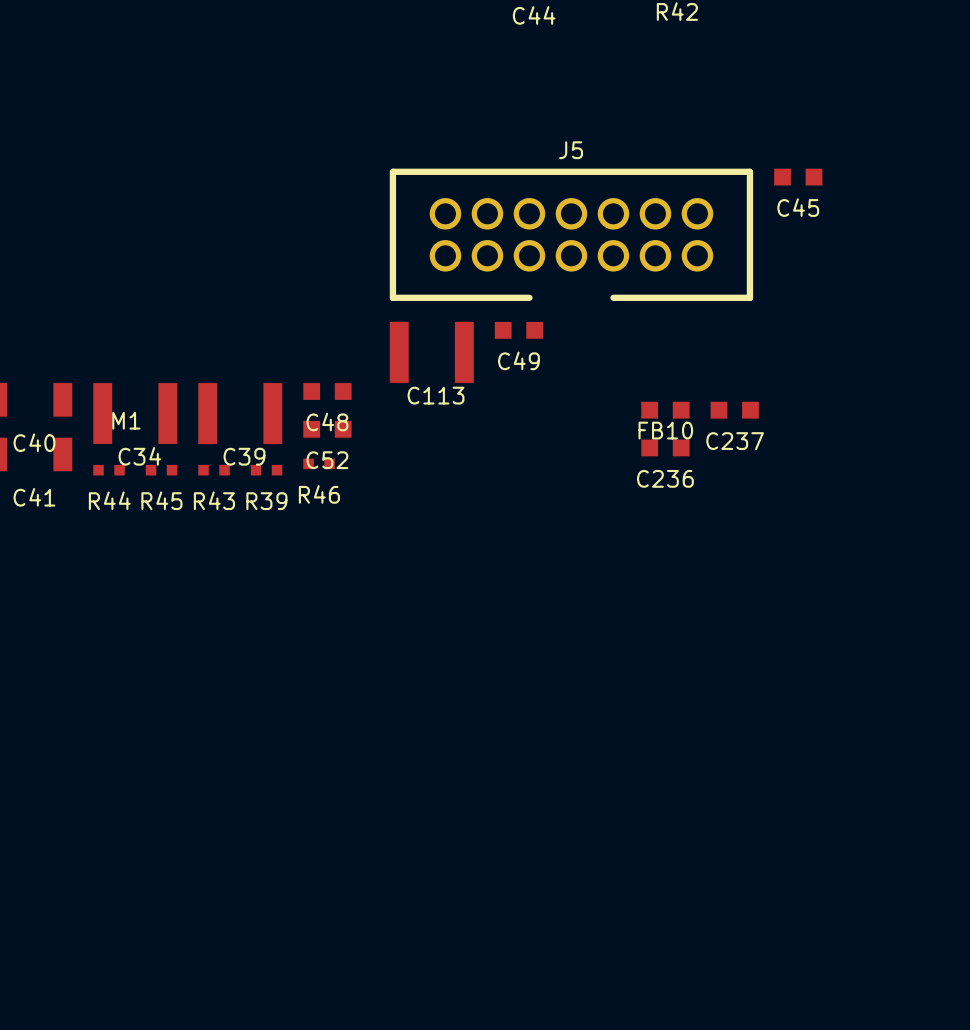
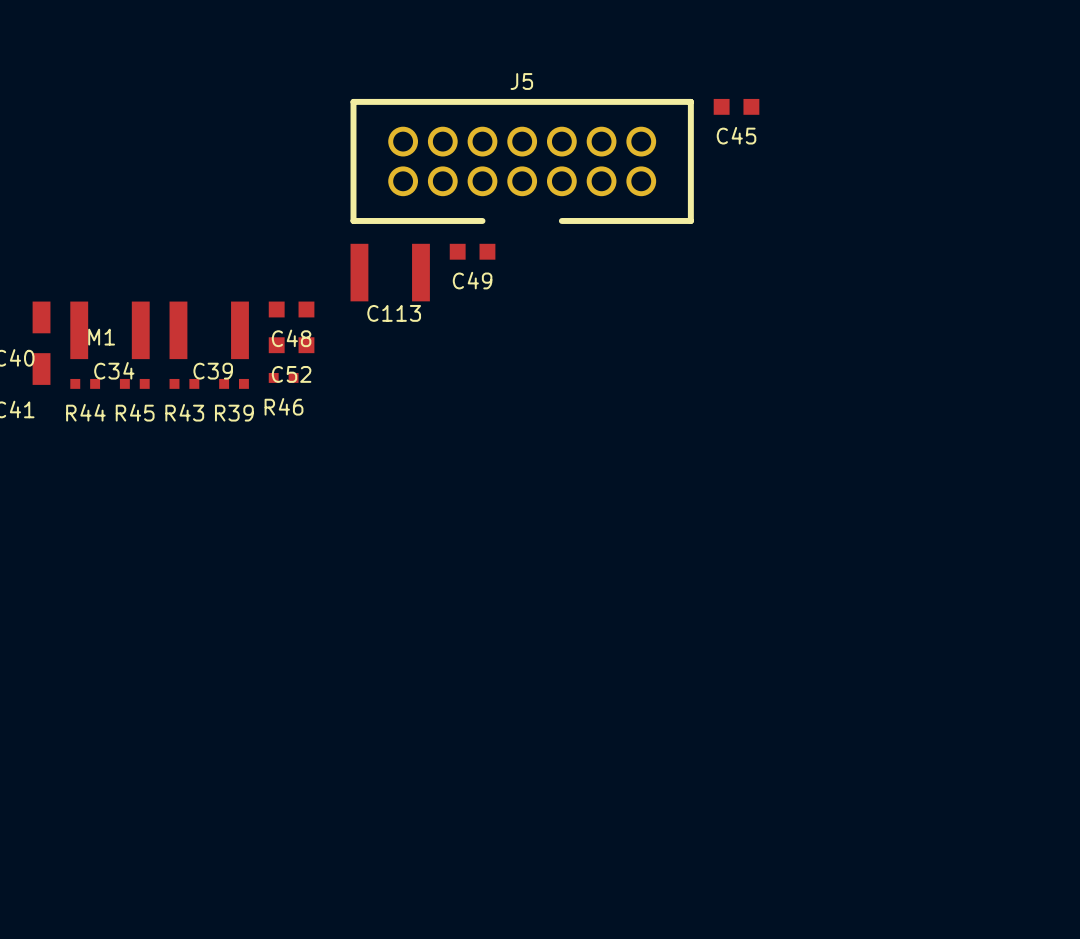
FB10: (665, 410) -> none
C237: (734, 410) -> none
C236: (665, 447) -> none

